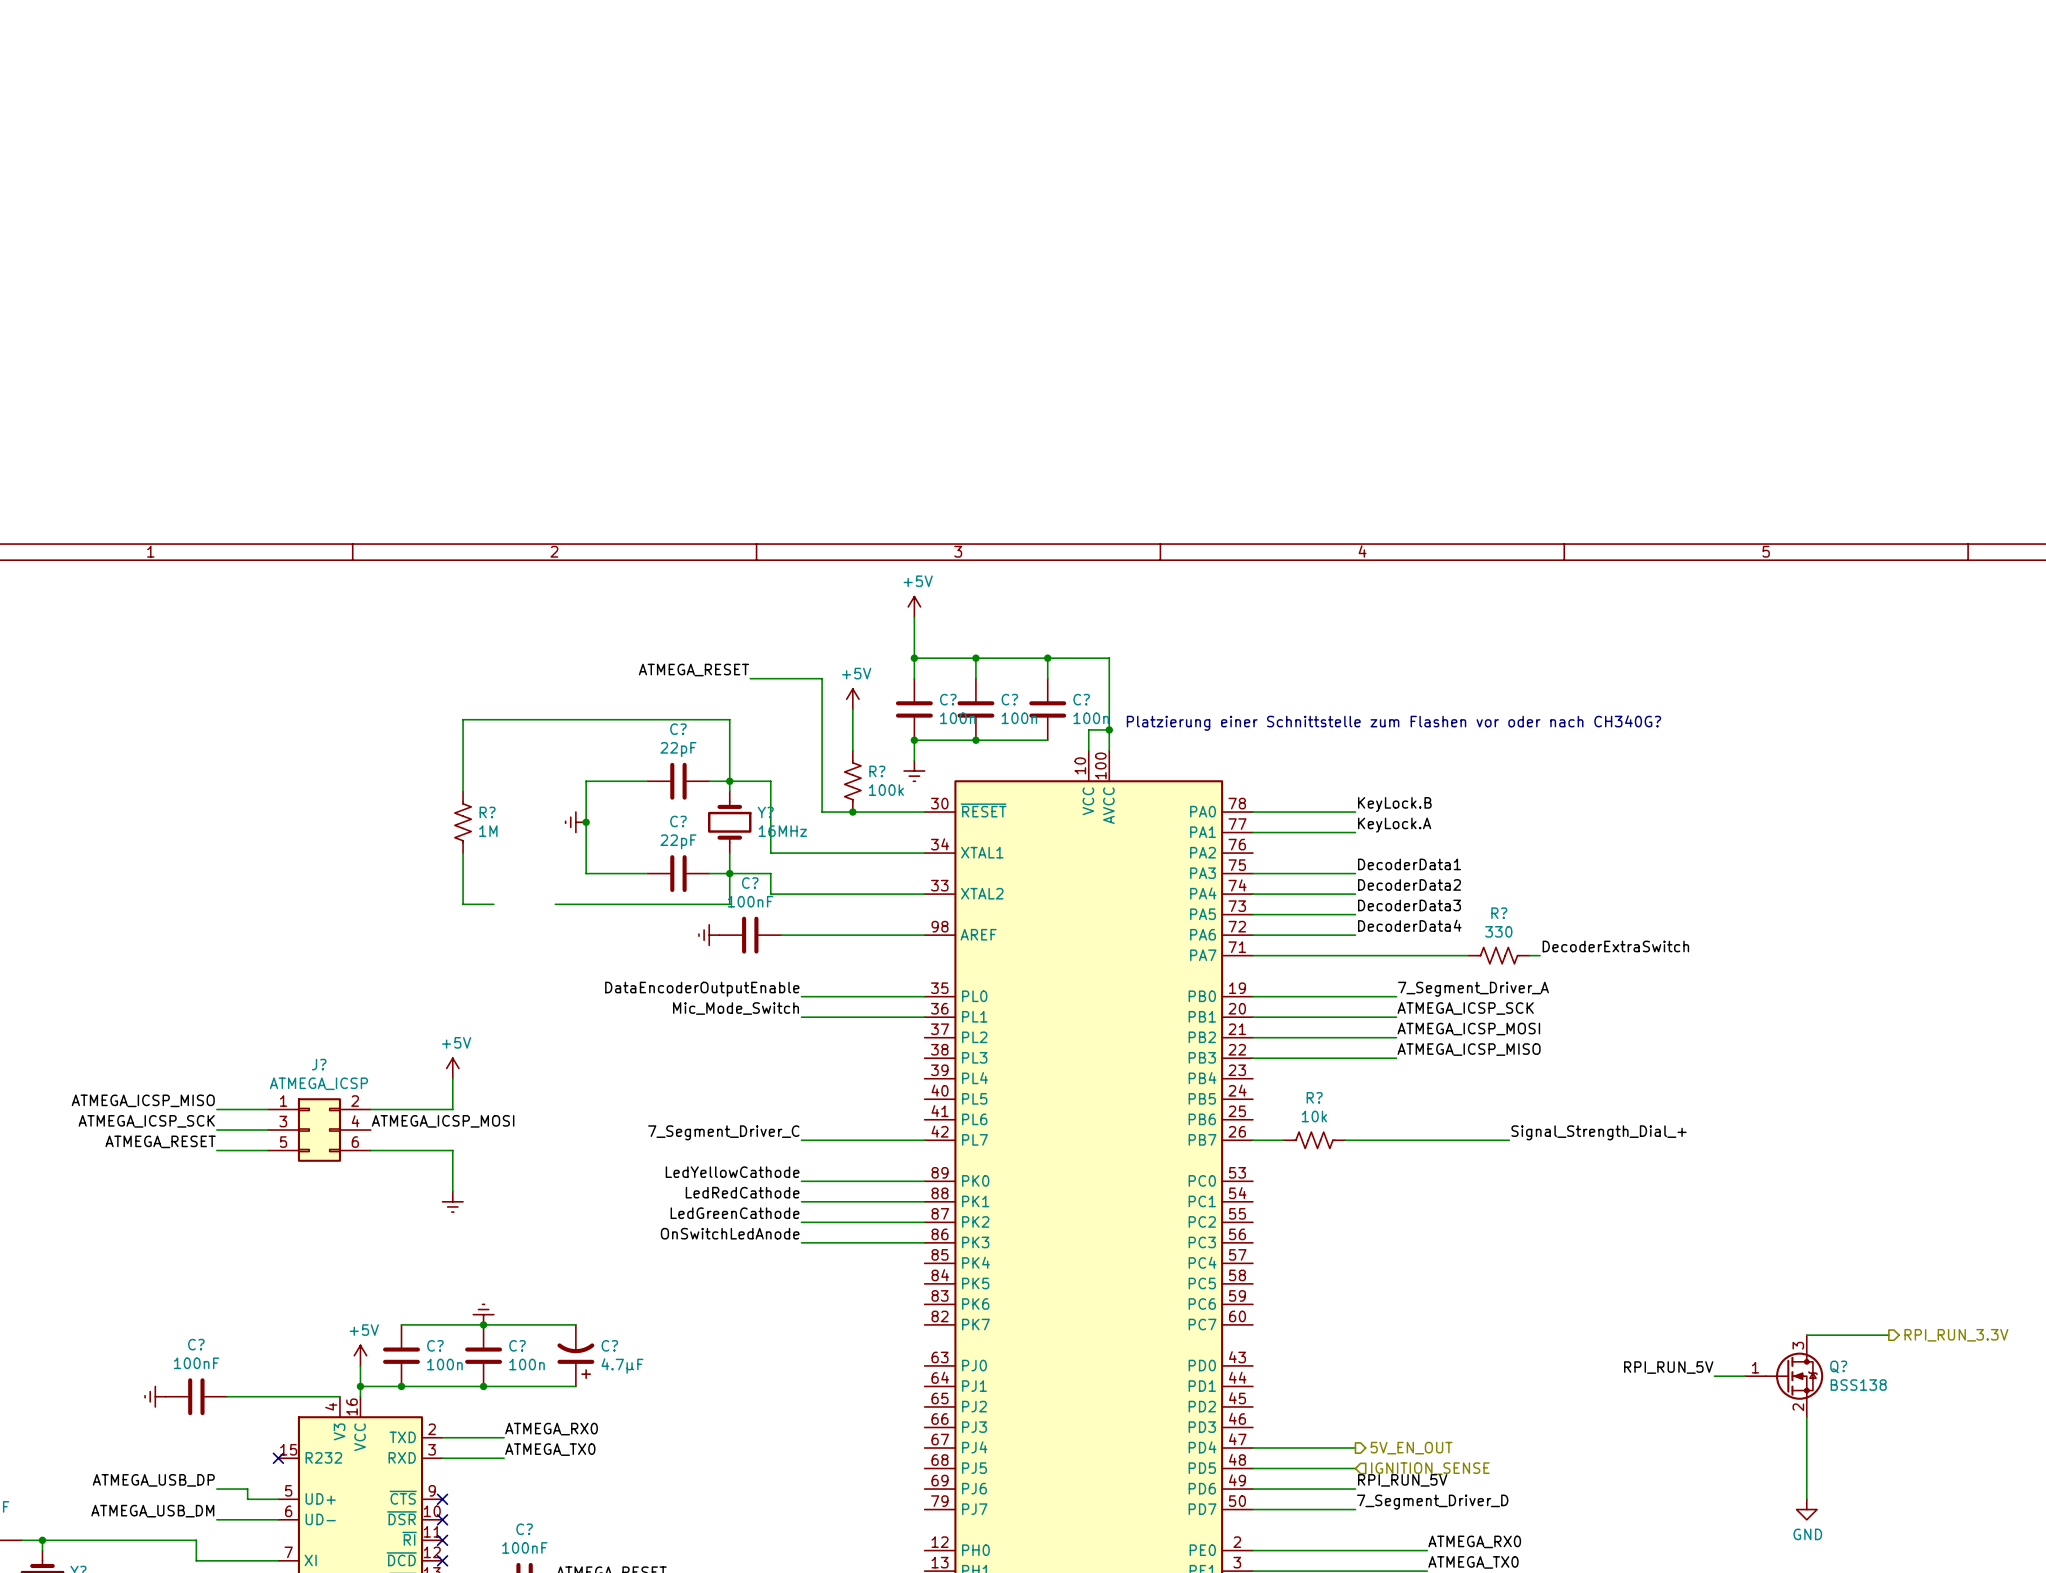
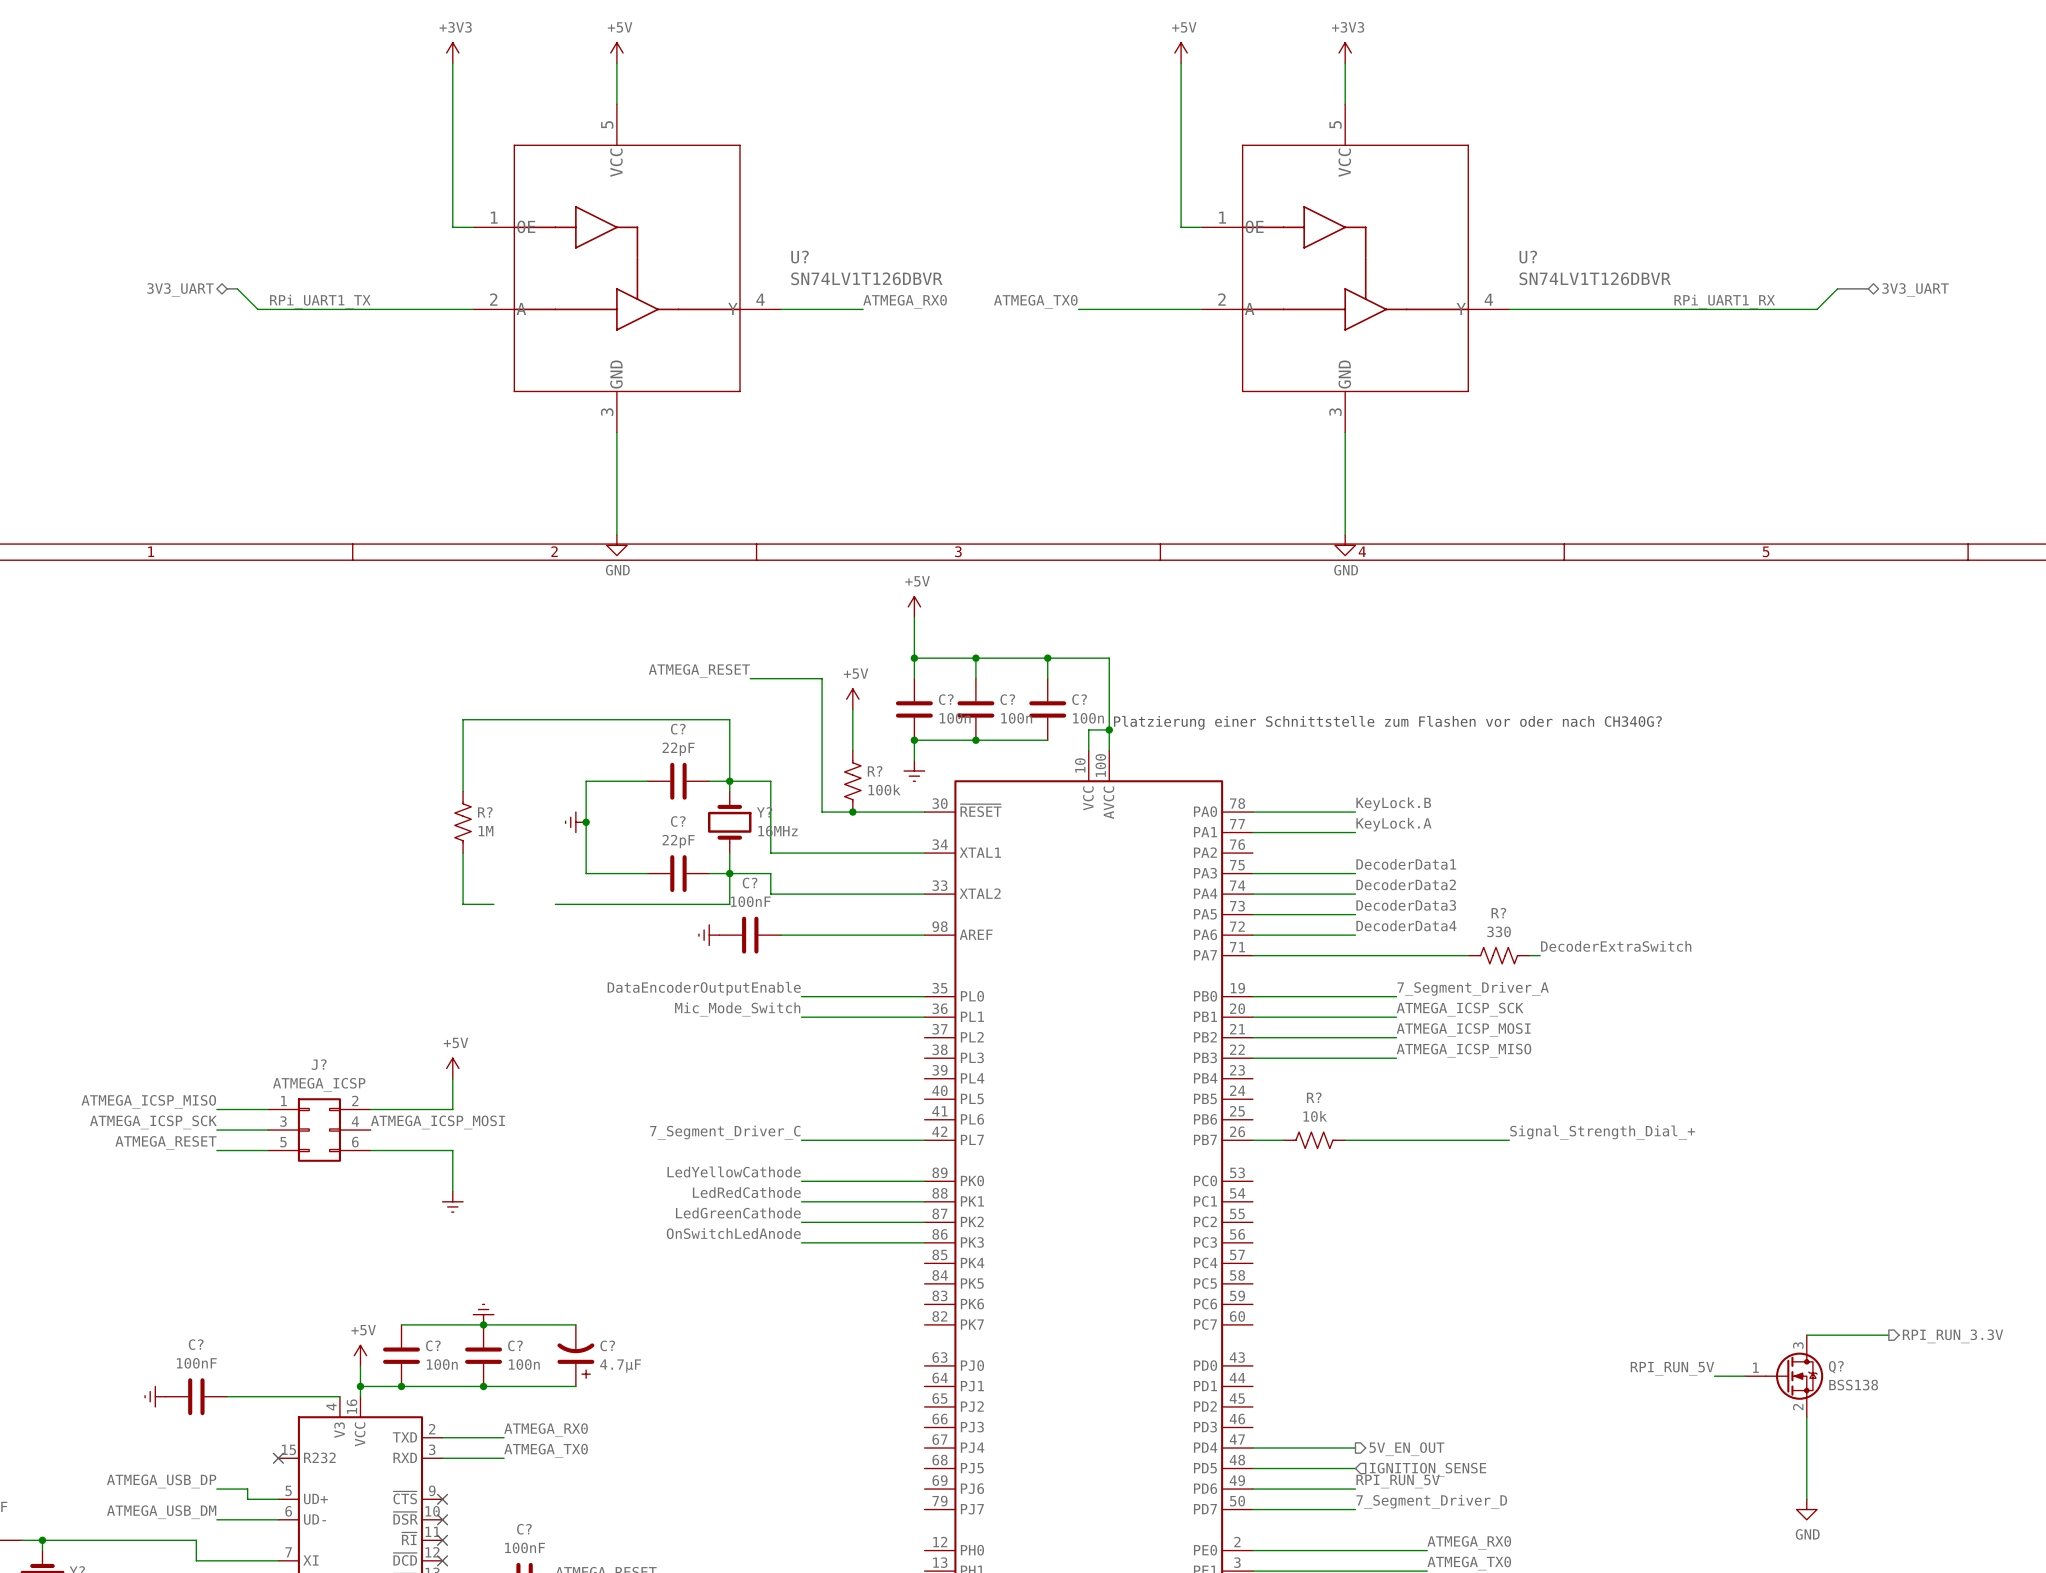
power symbol: none -> +3V3 (452, 52)
power symbol: none -> +5V (616, 52)
power symbol: none -> +5V (1181, 52)
power symbol: none -> +3V3 (1345, 52)
wire: none -> (452, 63) (452, 227) (473, 227)
wire: none -> (616, 63) (616, 104)
wire: none -> (1181, 63) (1181, 227) (1201, 227)
wire: none -> (1345, 63) (1345, 104)
U?: none -> SN74LV1T126DBVR (627, 268)
U?: none -> SN74LV1T126DBVR (1355, 268)
bus: none -> (227, 288) (237, 288)
wire: none -> (237, 288) (257, 309) (473, 309)
wire: none -> (1837, 288) (1817, 309) (1509, 309)
bus: none -> (1837, 288) (1868, 288)
hierarchical label: none -> 3V3_UART (180, 290)
hierarchical label: none -> 3V3_UART (1915, 290)
label: none -> RPi_UART1_TX (320, 301)
label: none -> ATMEGA_RX0 (905, 301)
label: none -> ATMEGA_TX0 (1035, 301)
label: none -> RPi_UART1_RX (1724, 301)
wire: none -> (781, 309) (863, 309)
wire: none -> (1078, 309) (1201, 309)
wire: none -> (616, 432) (616, 535)
wire: none -> (1345, 432) (1345, 535)
power symbol: none -> GND (616, 545)
power symbol: none -> GND (1345, 545)

